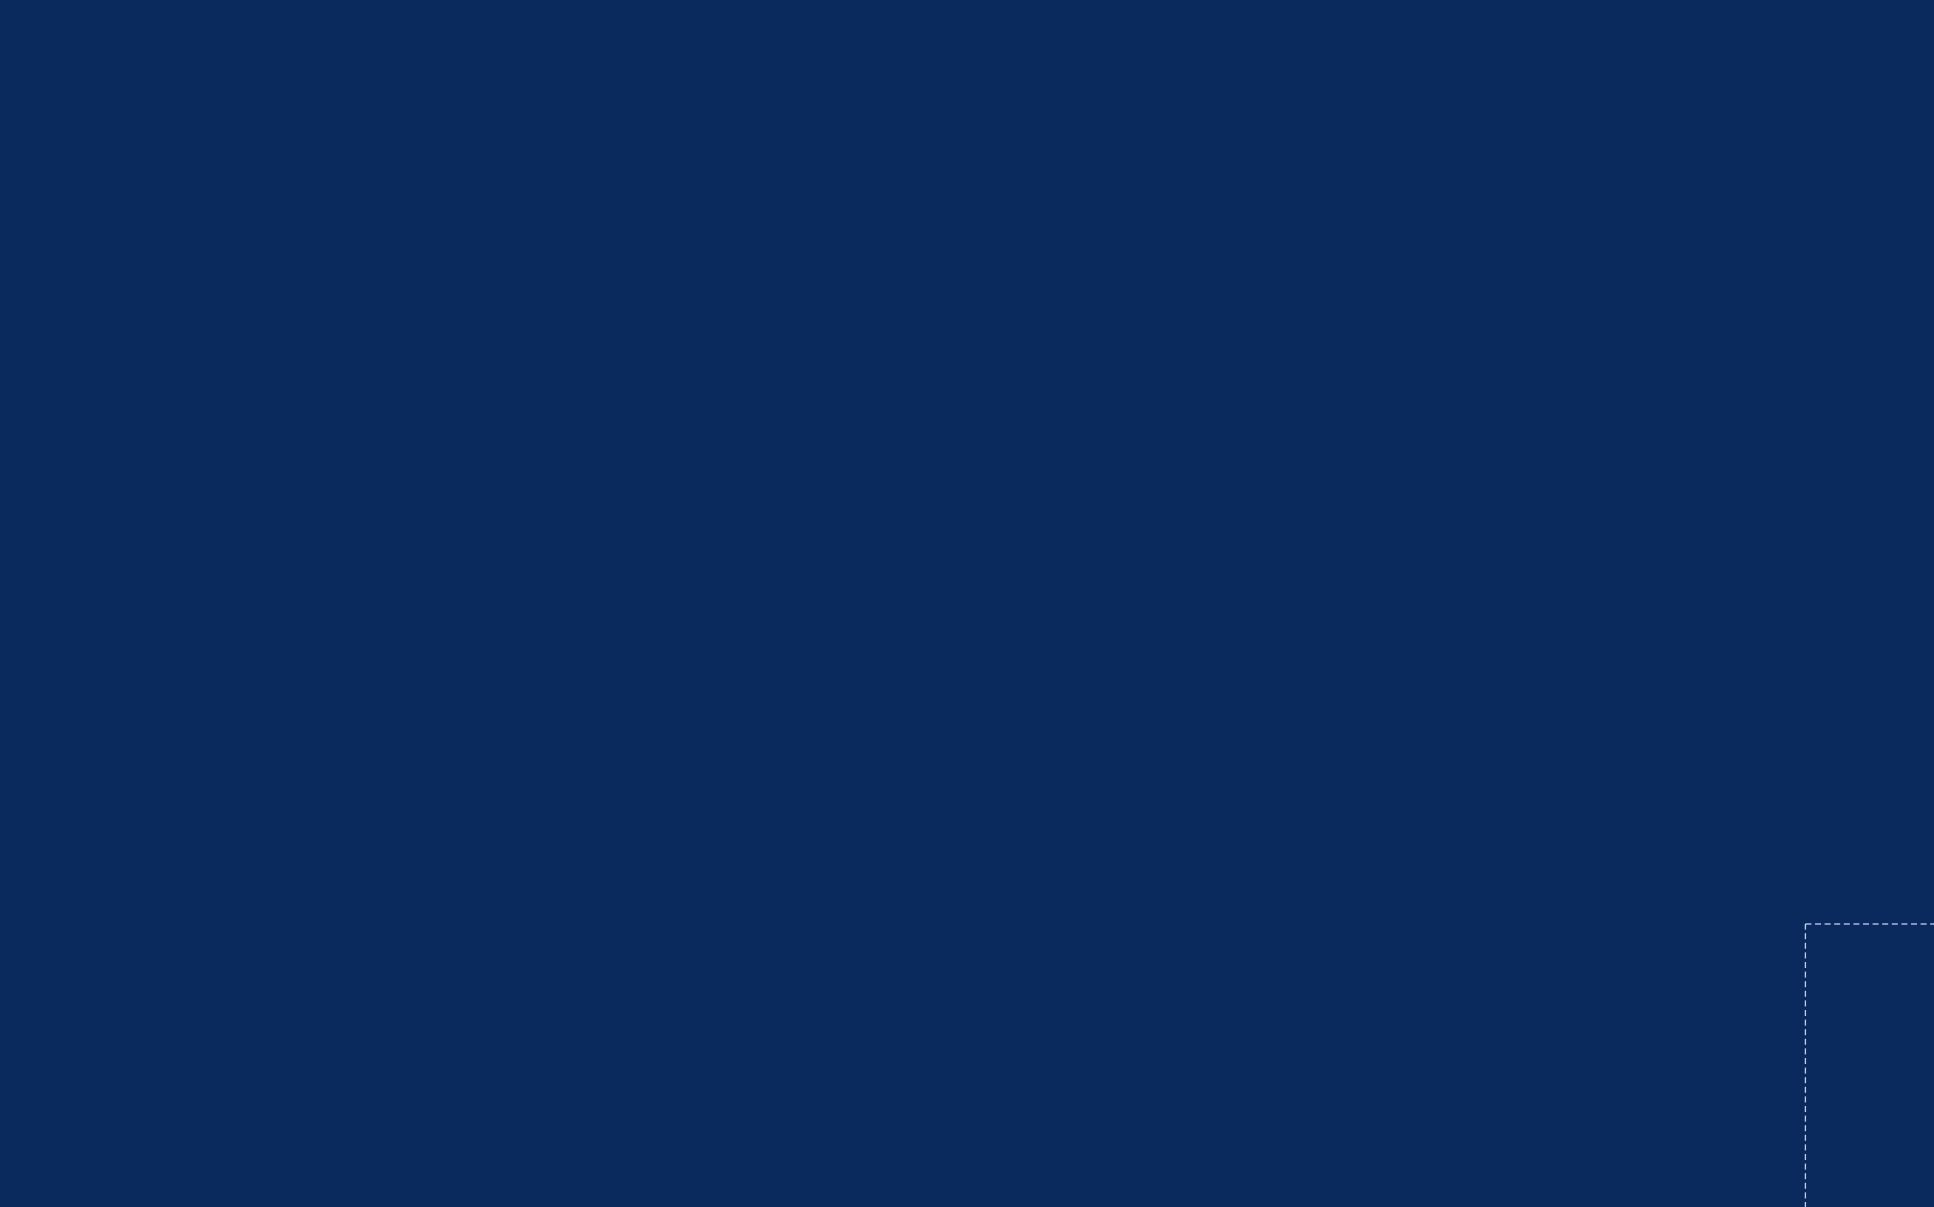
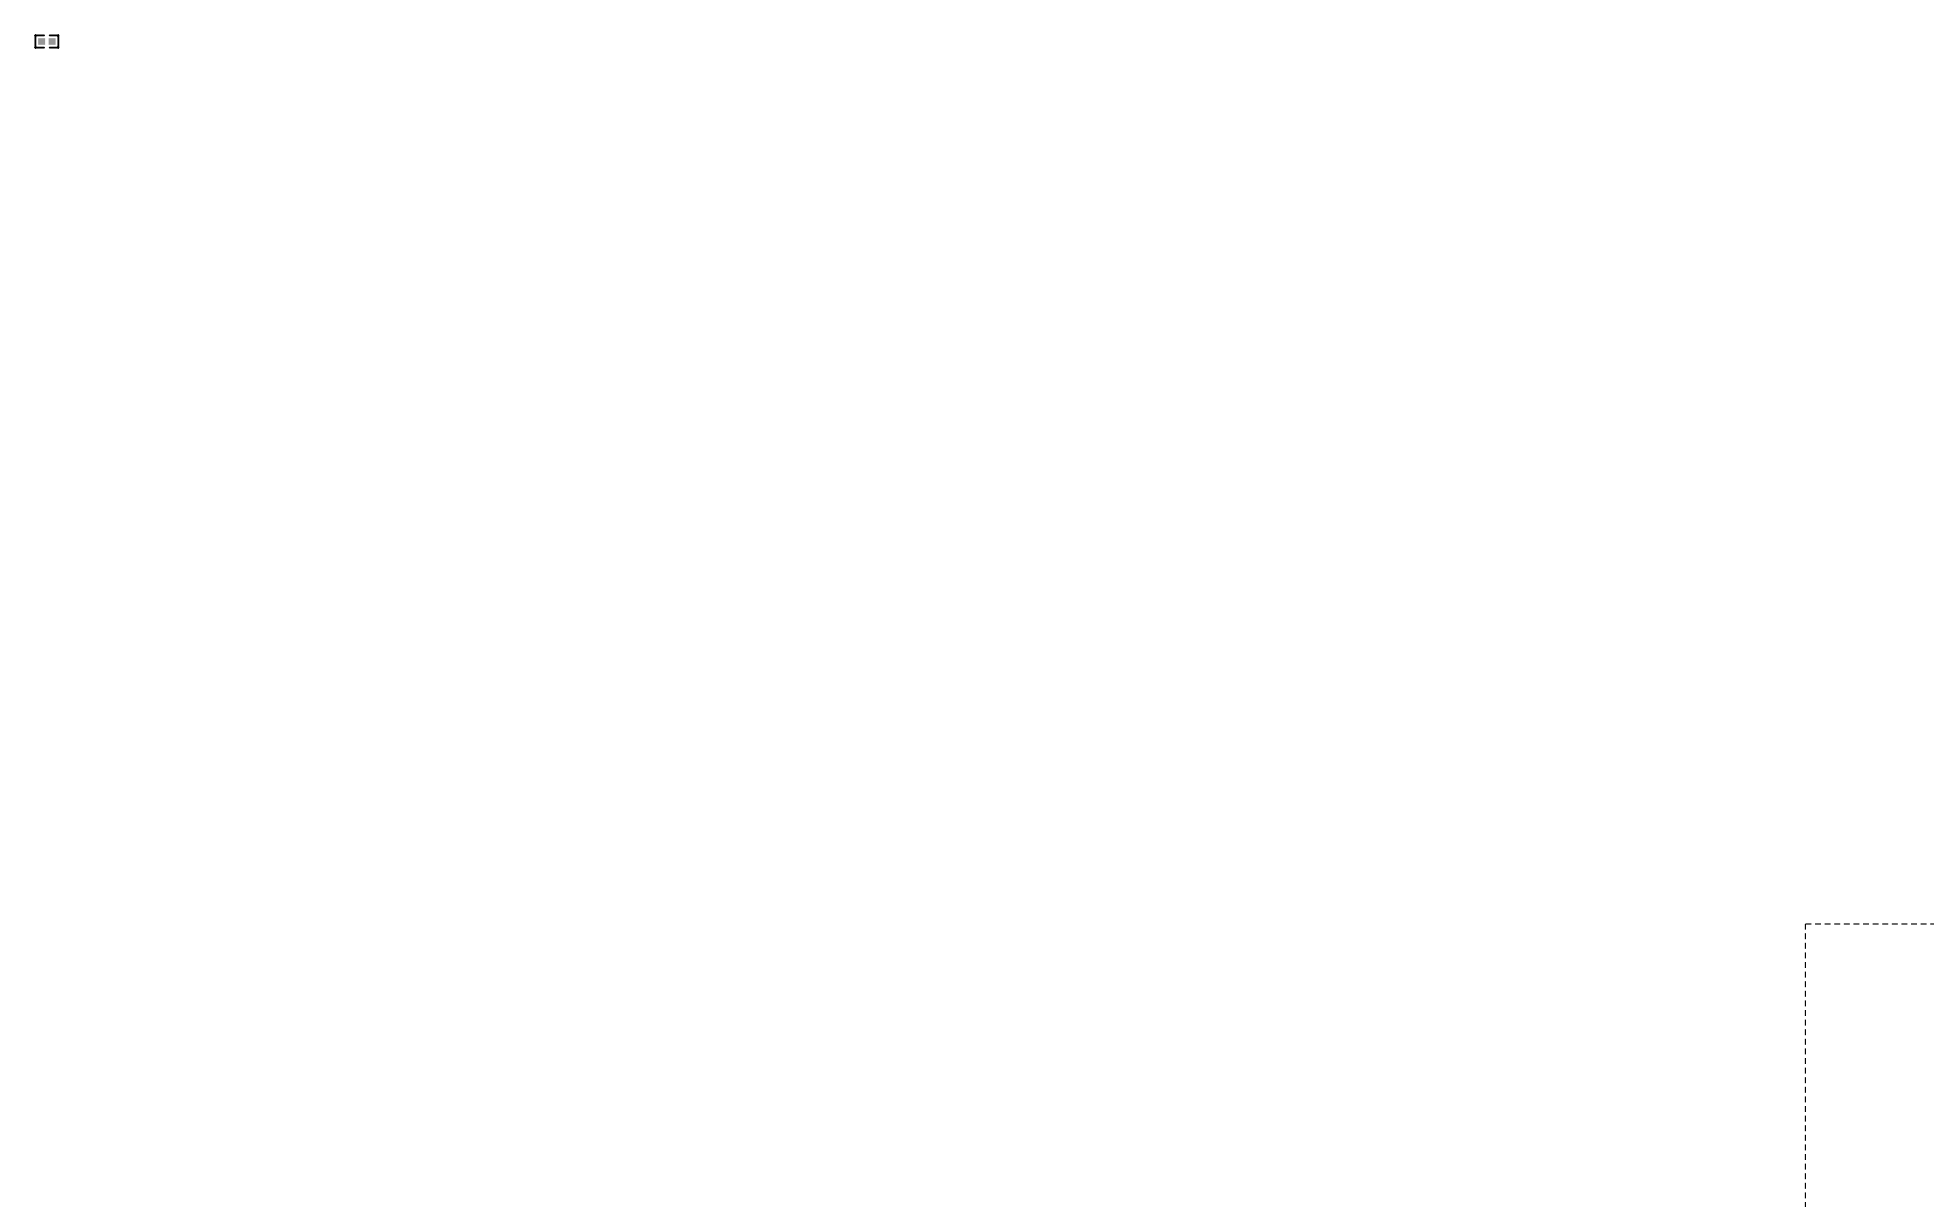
part: none -> (46, 41)

